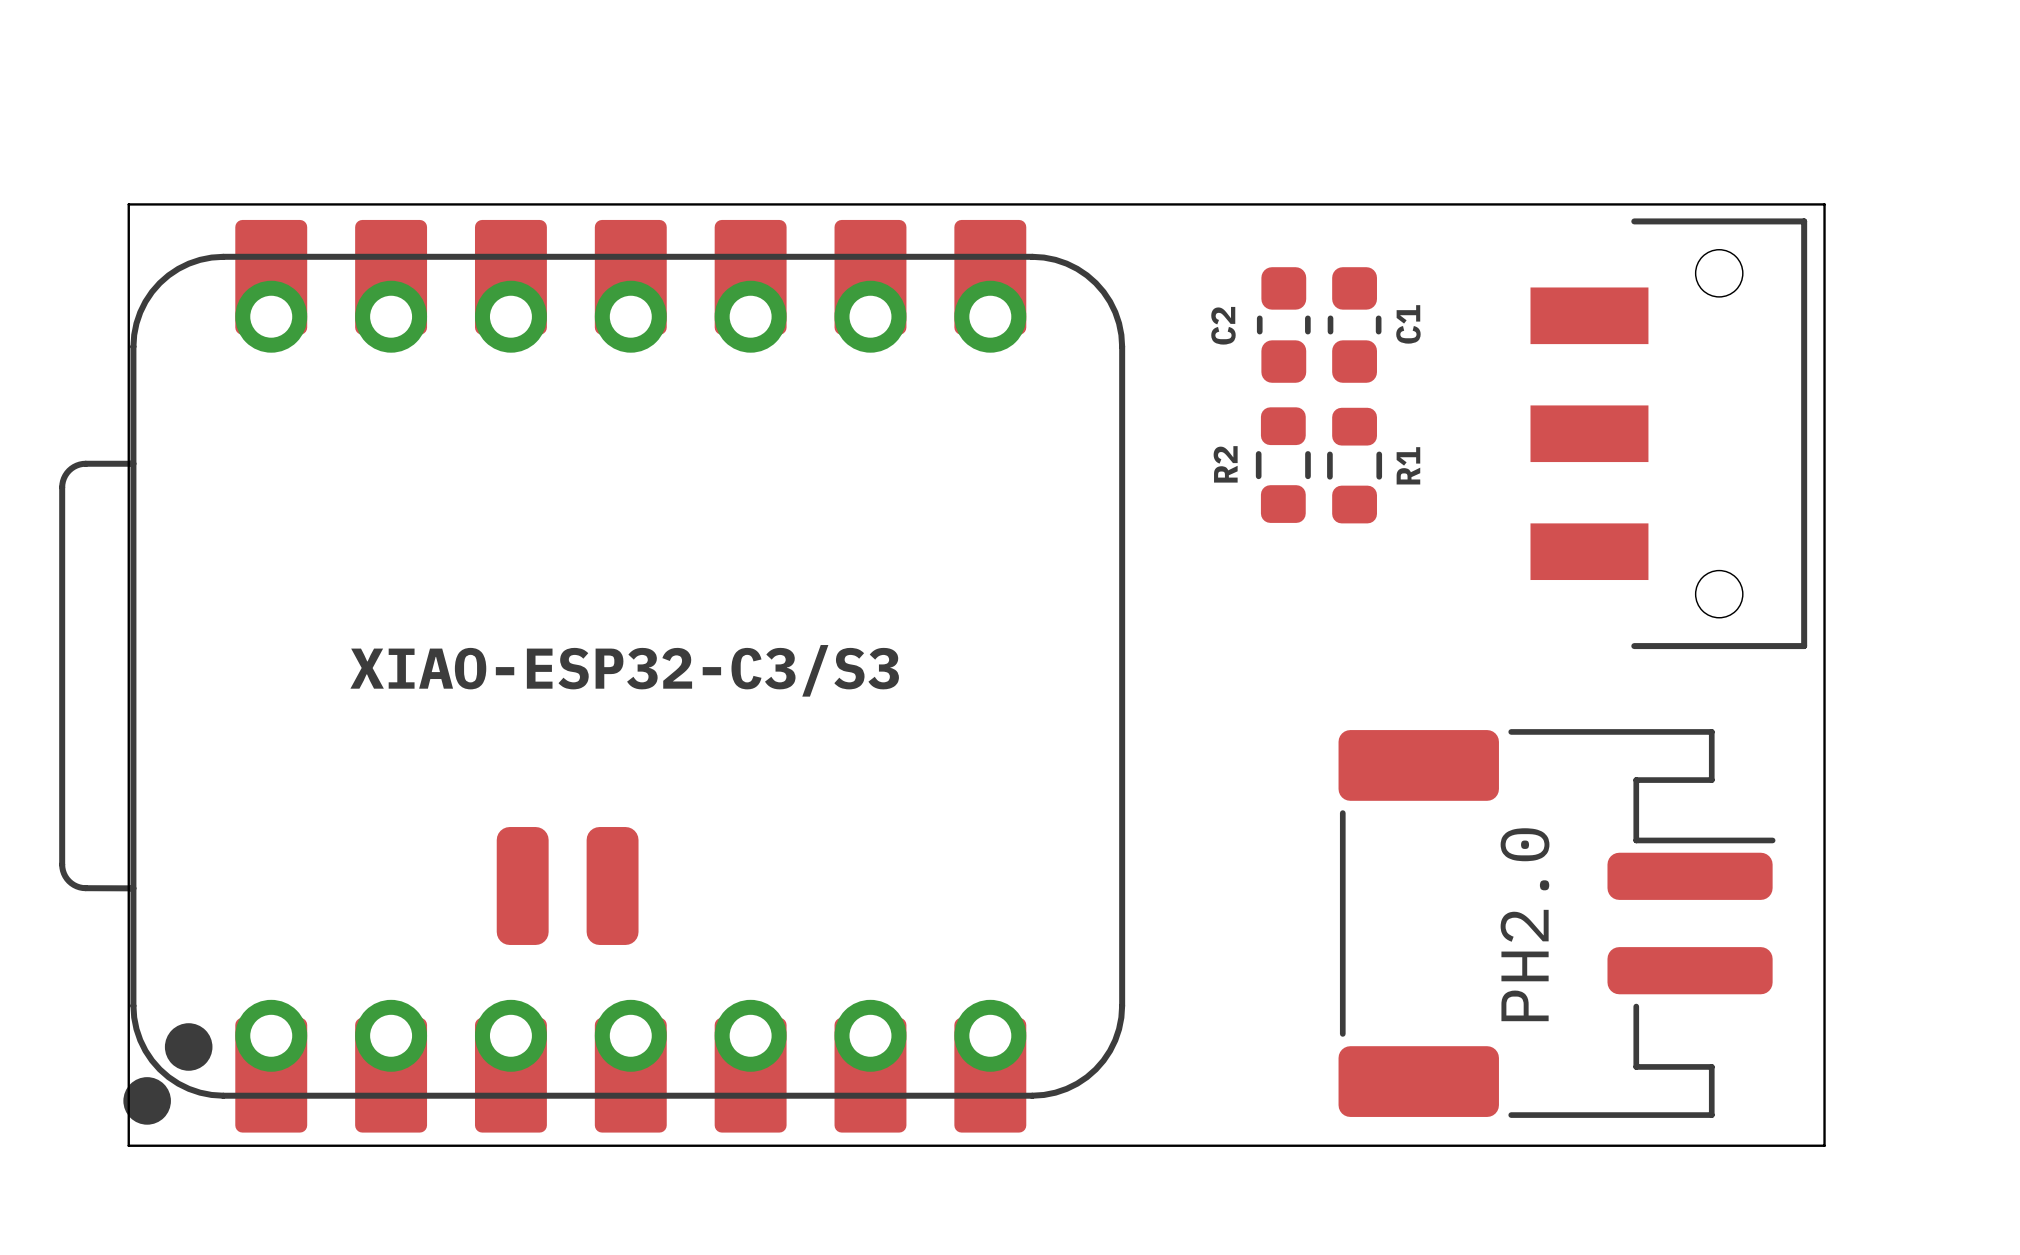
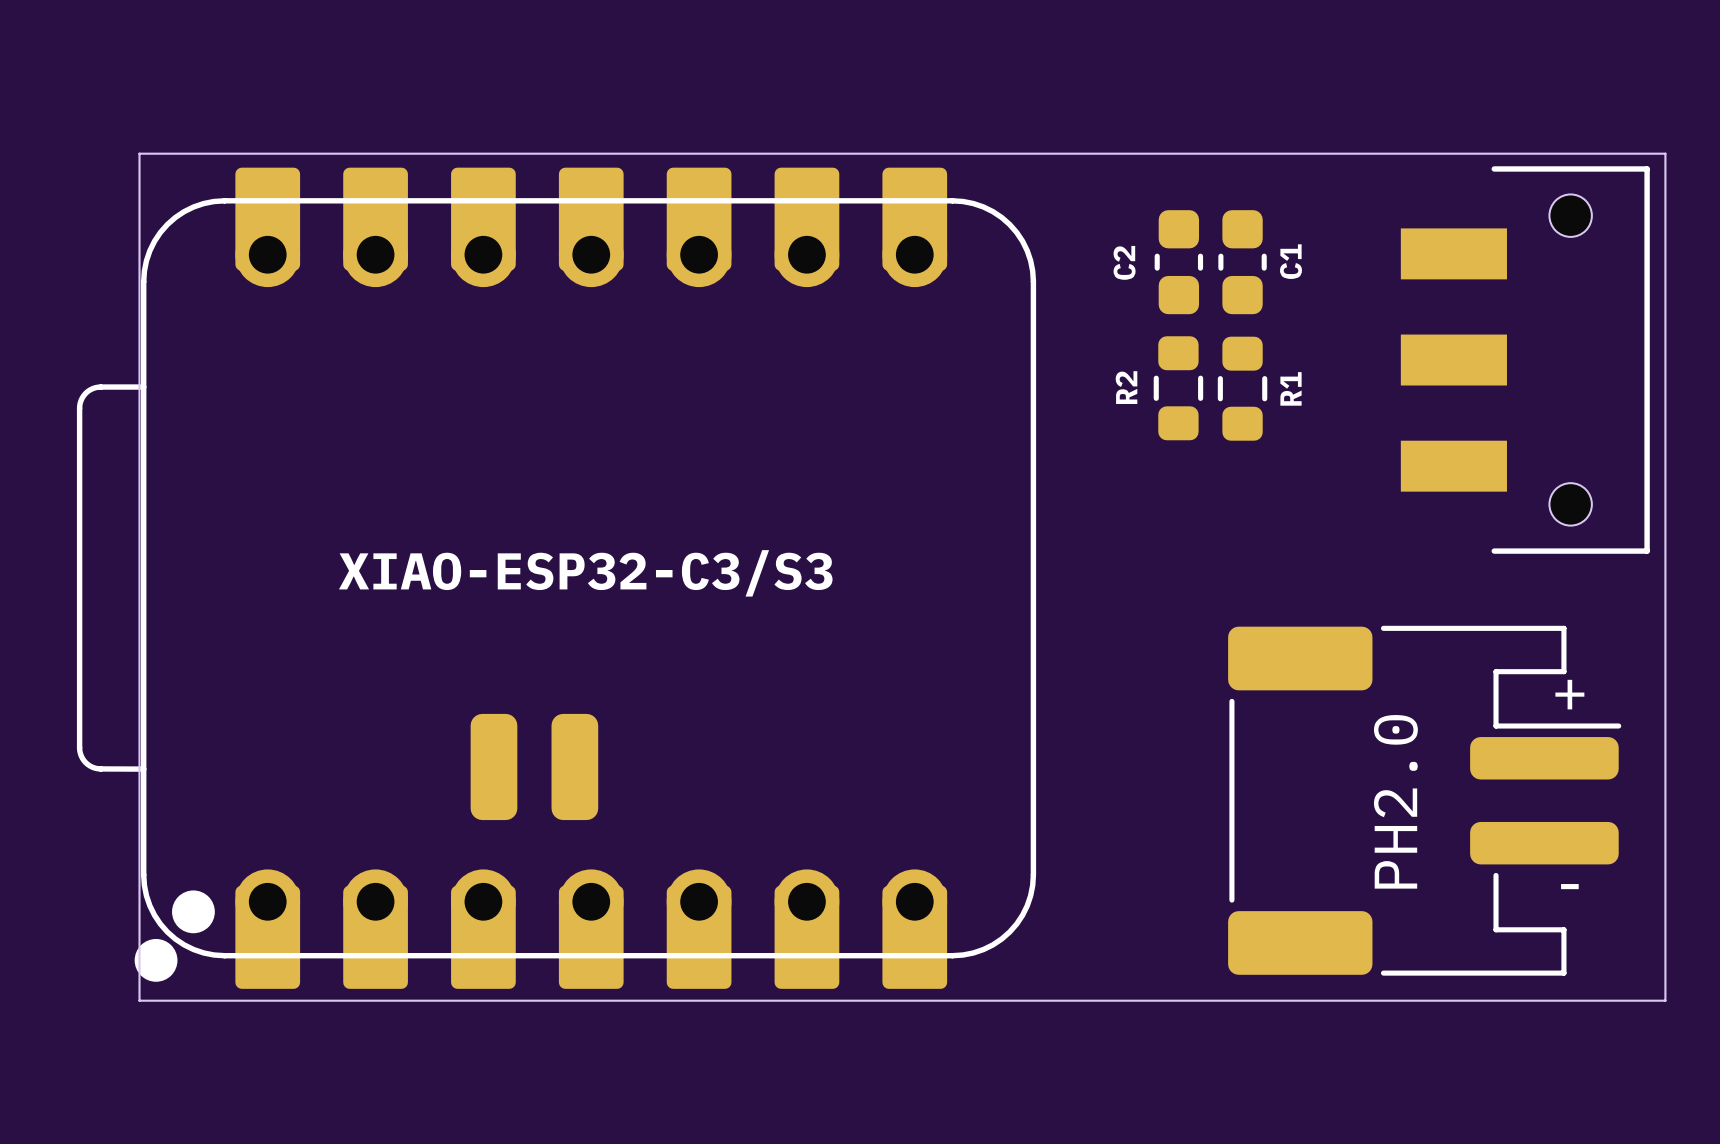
text: none -> + (1569, 694)
text: none -> - (1569, 886)

